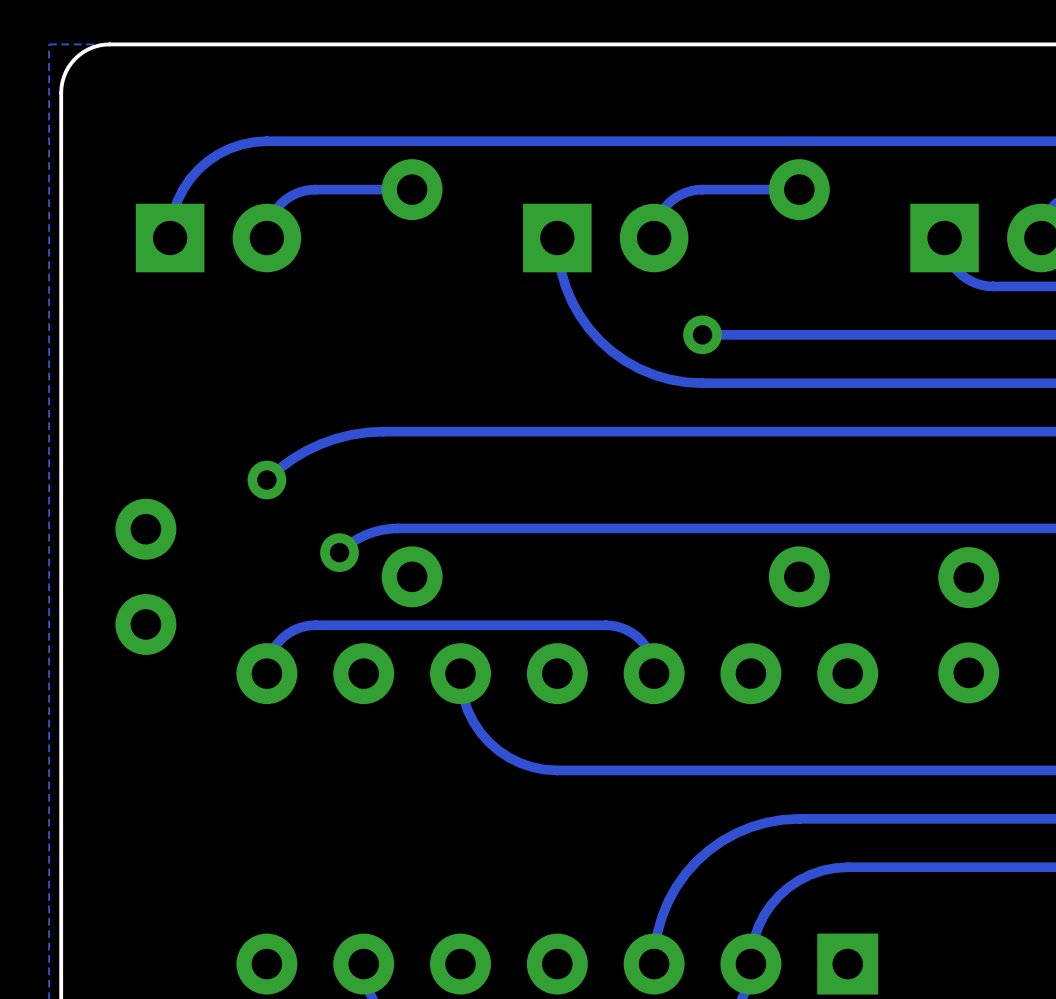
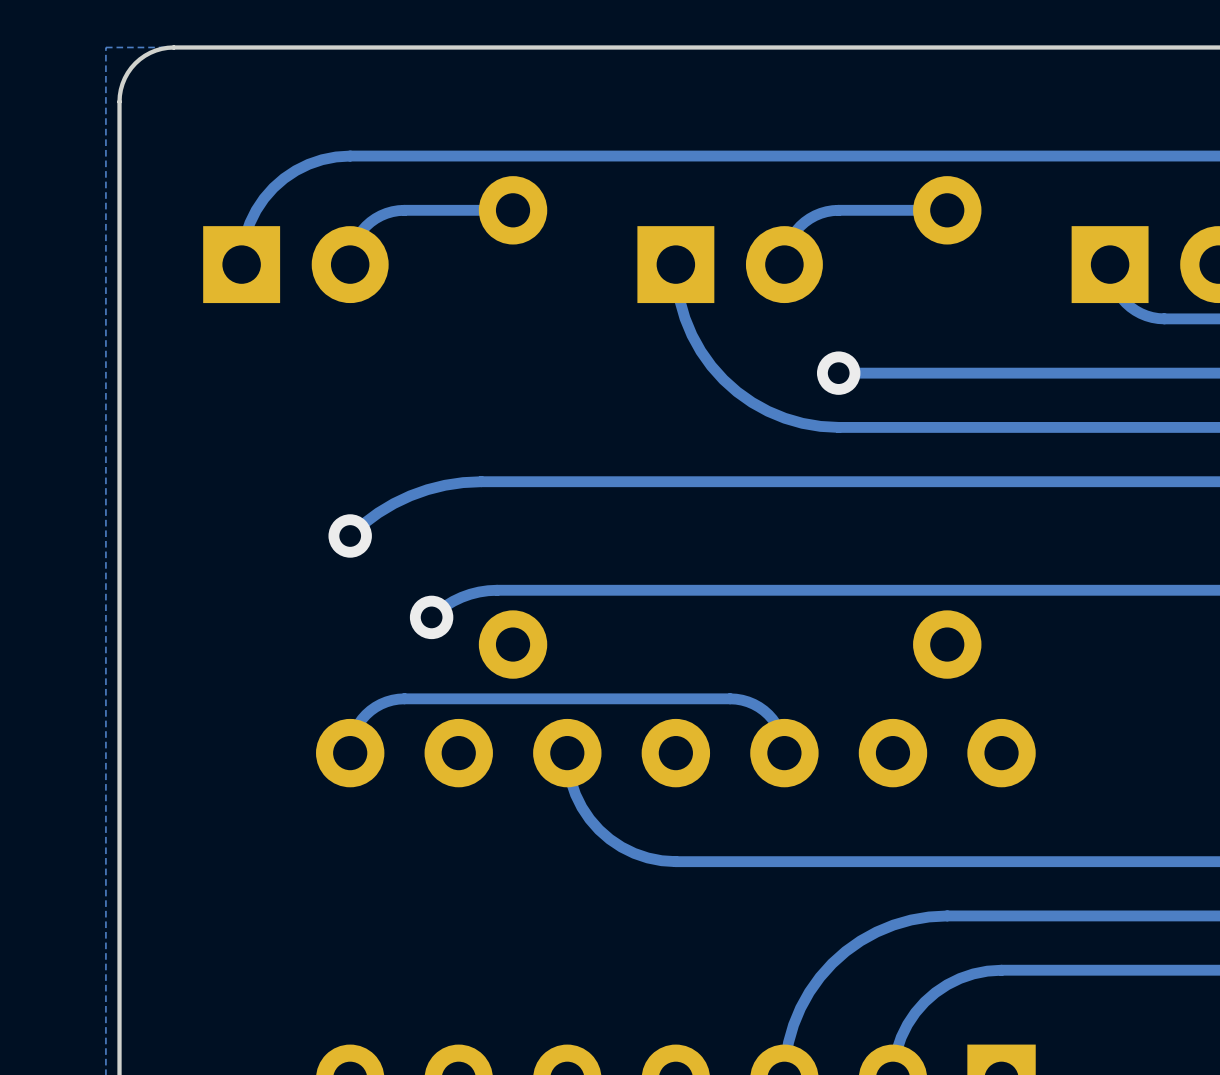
part: (145, 576) -> none
part: (968, 625) -> none

